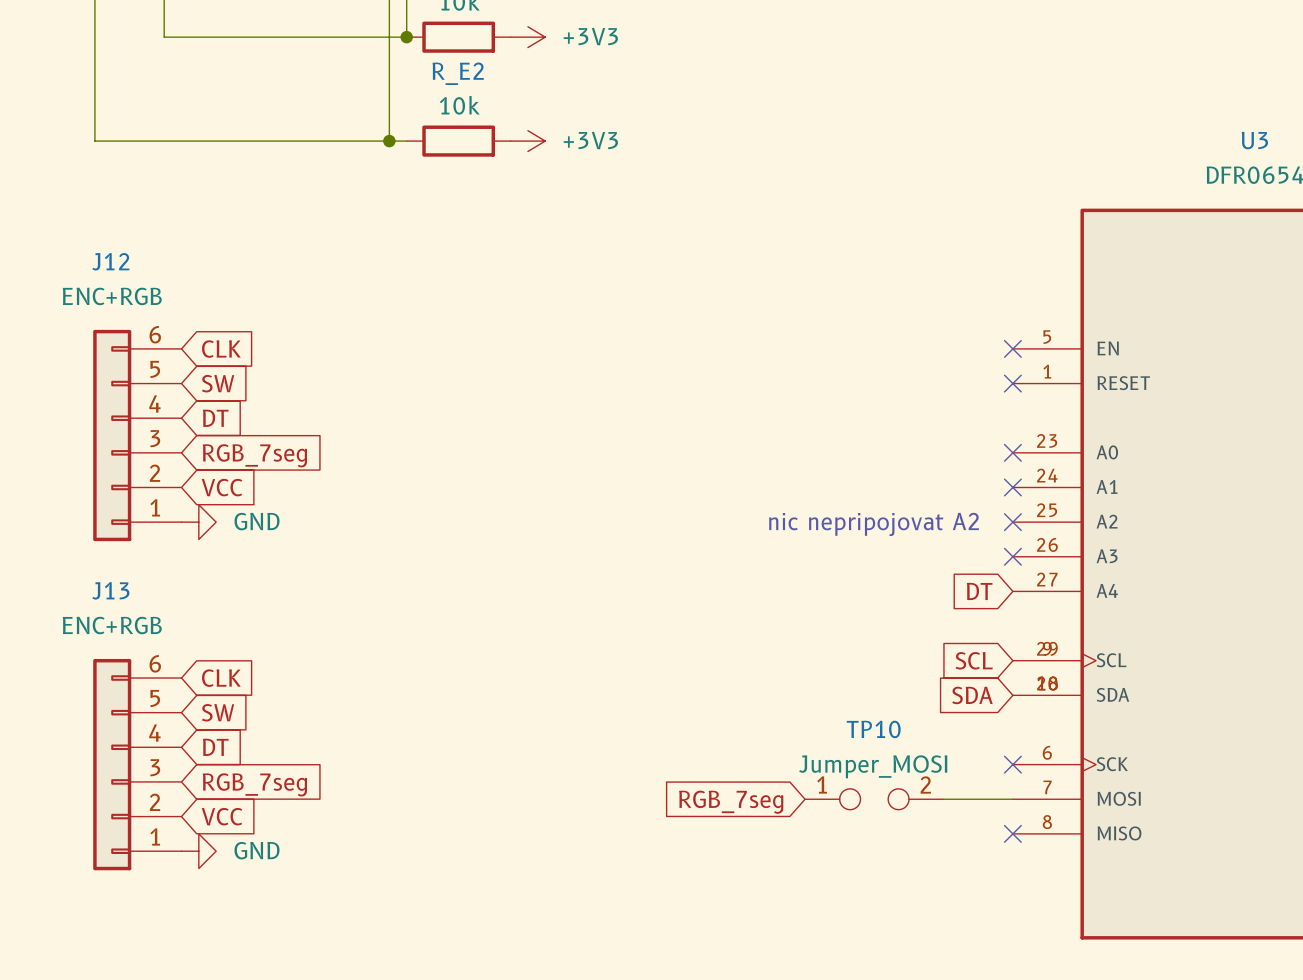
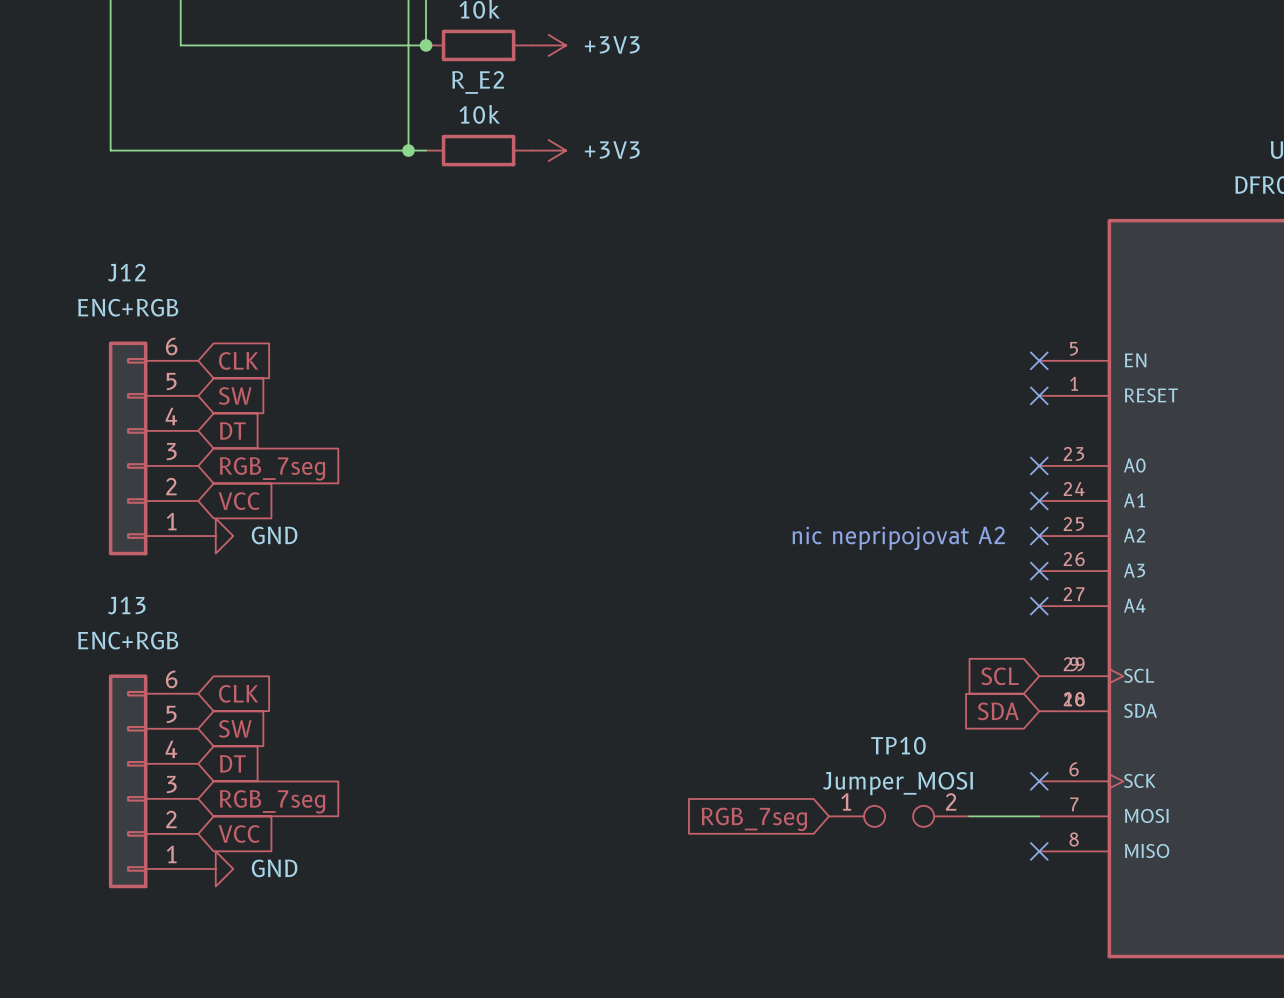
global label: DT (979, 591) -> none
no-connect mark: none -> (1039, 606)

